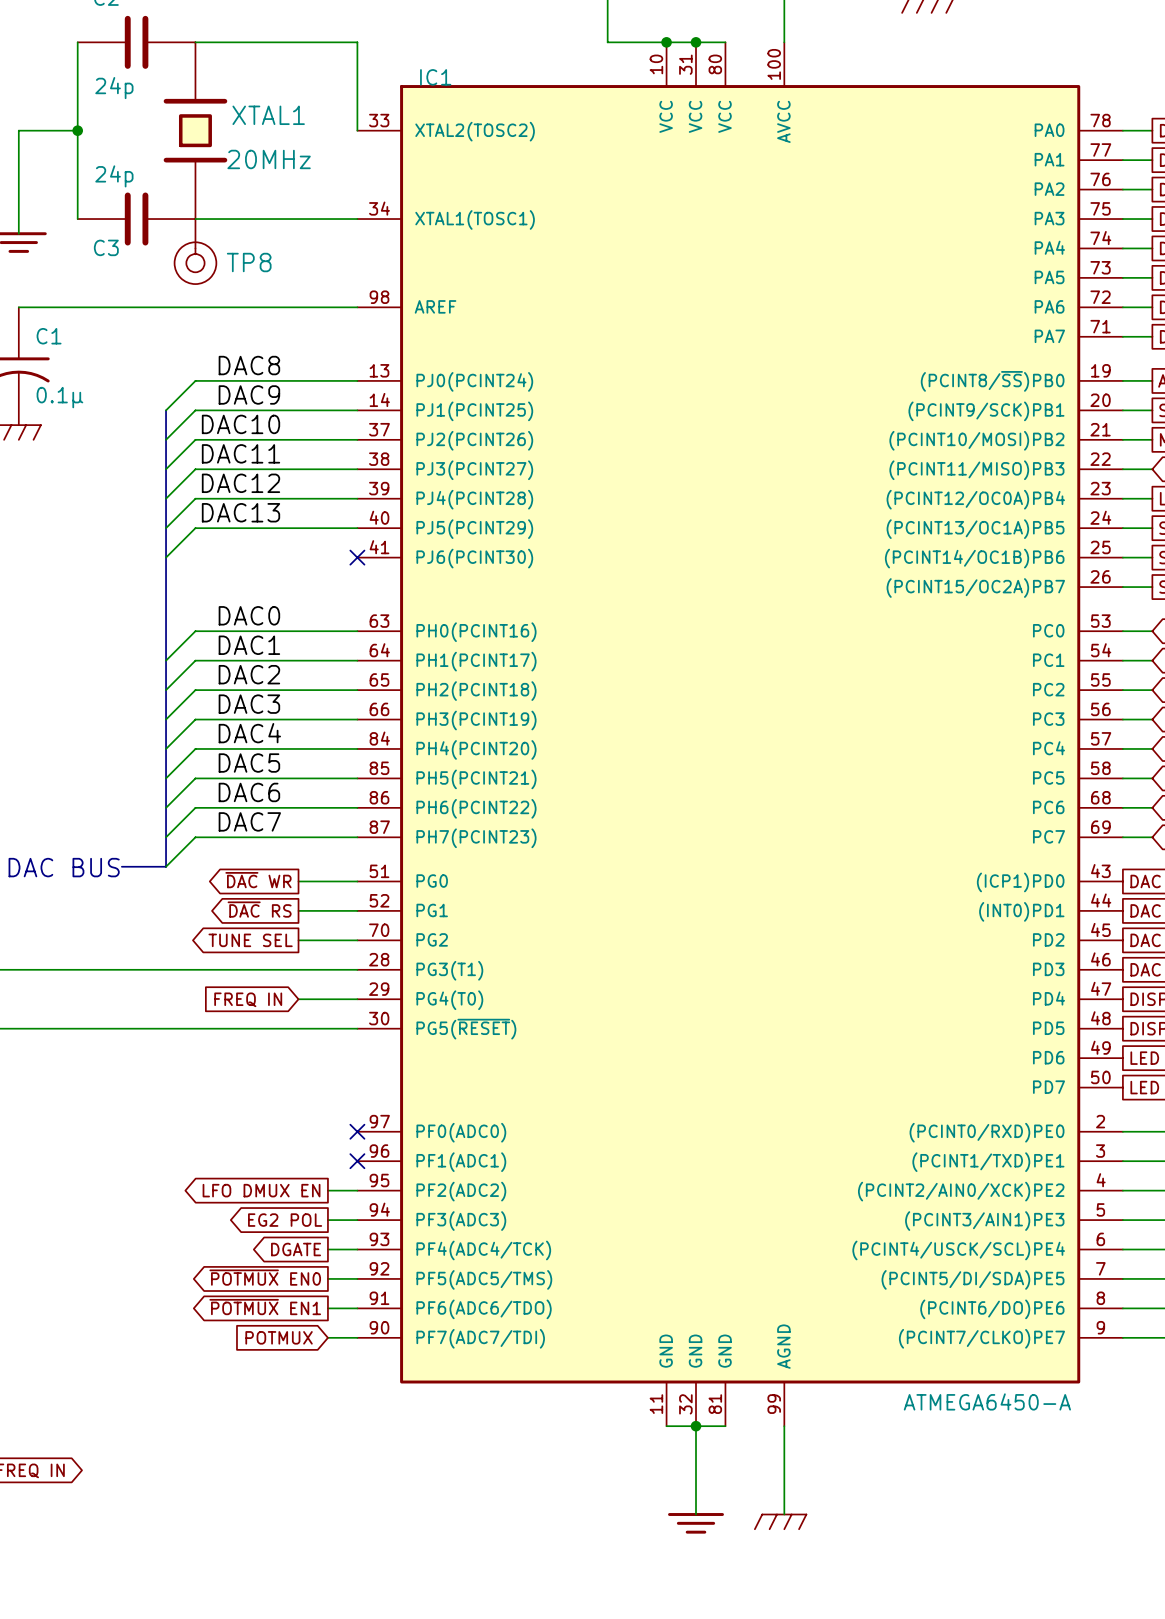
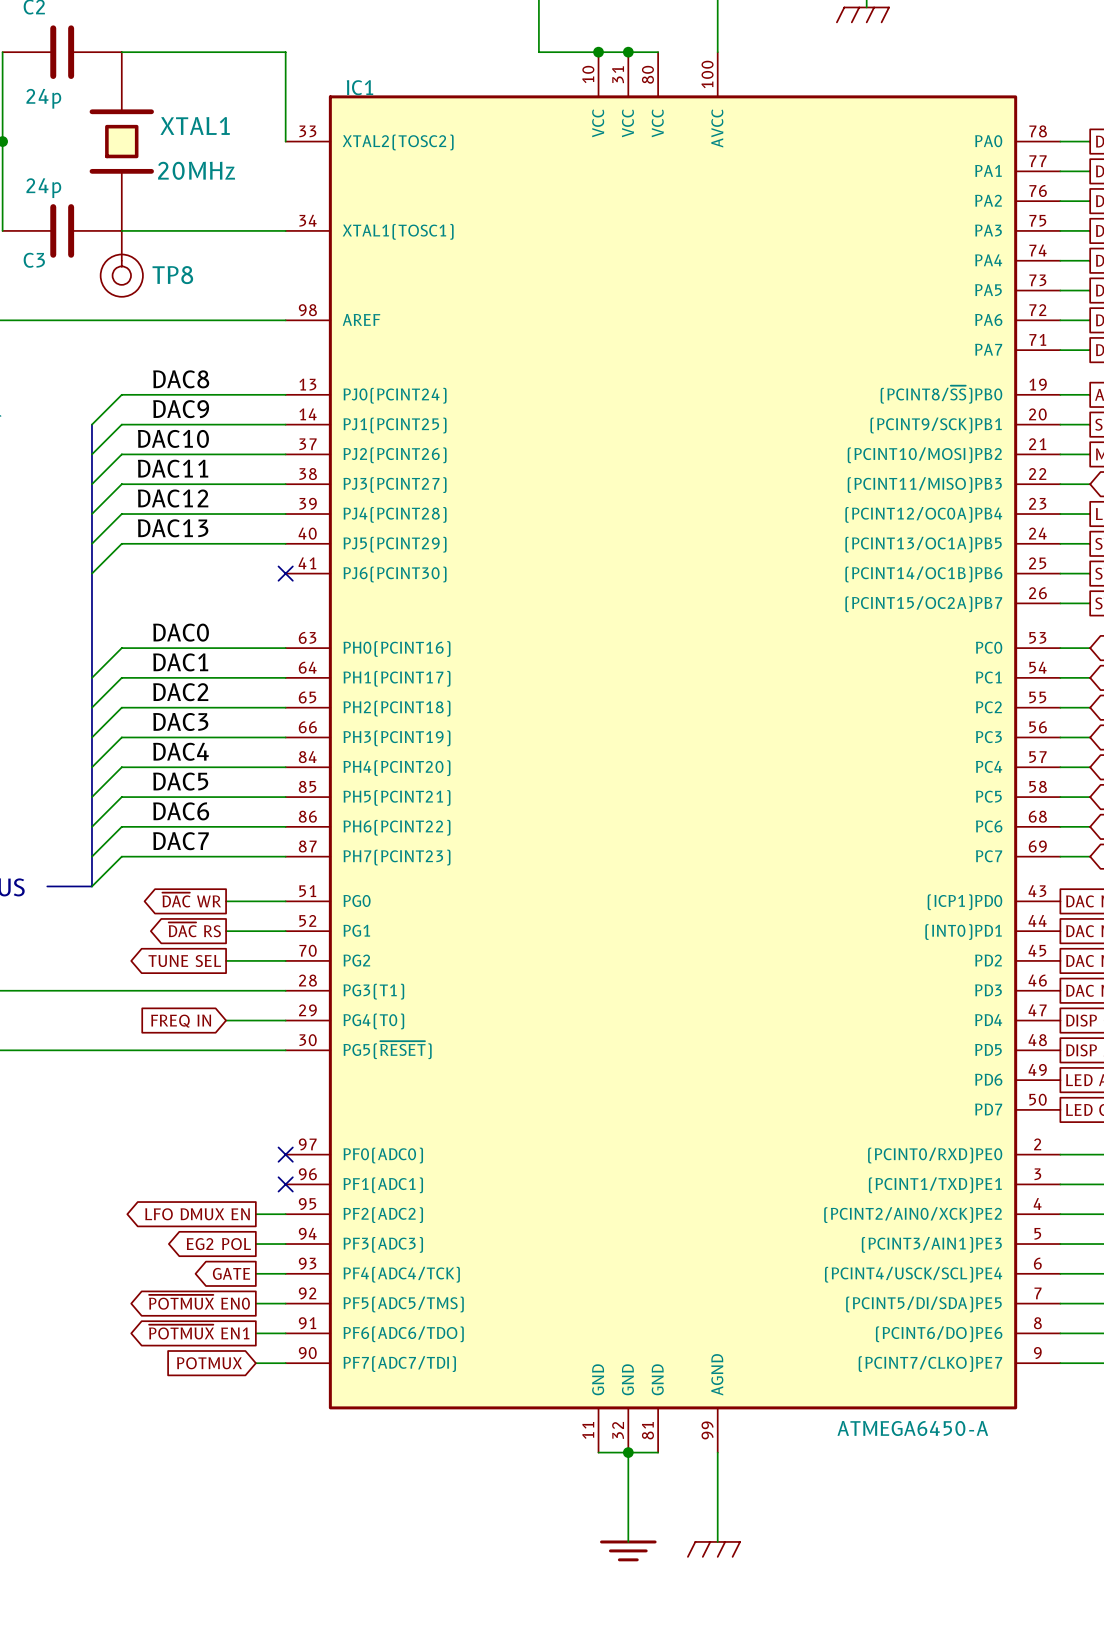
global label: DGATE (296, 1249) -> GATE (231, 1273)

